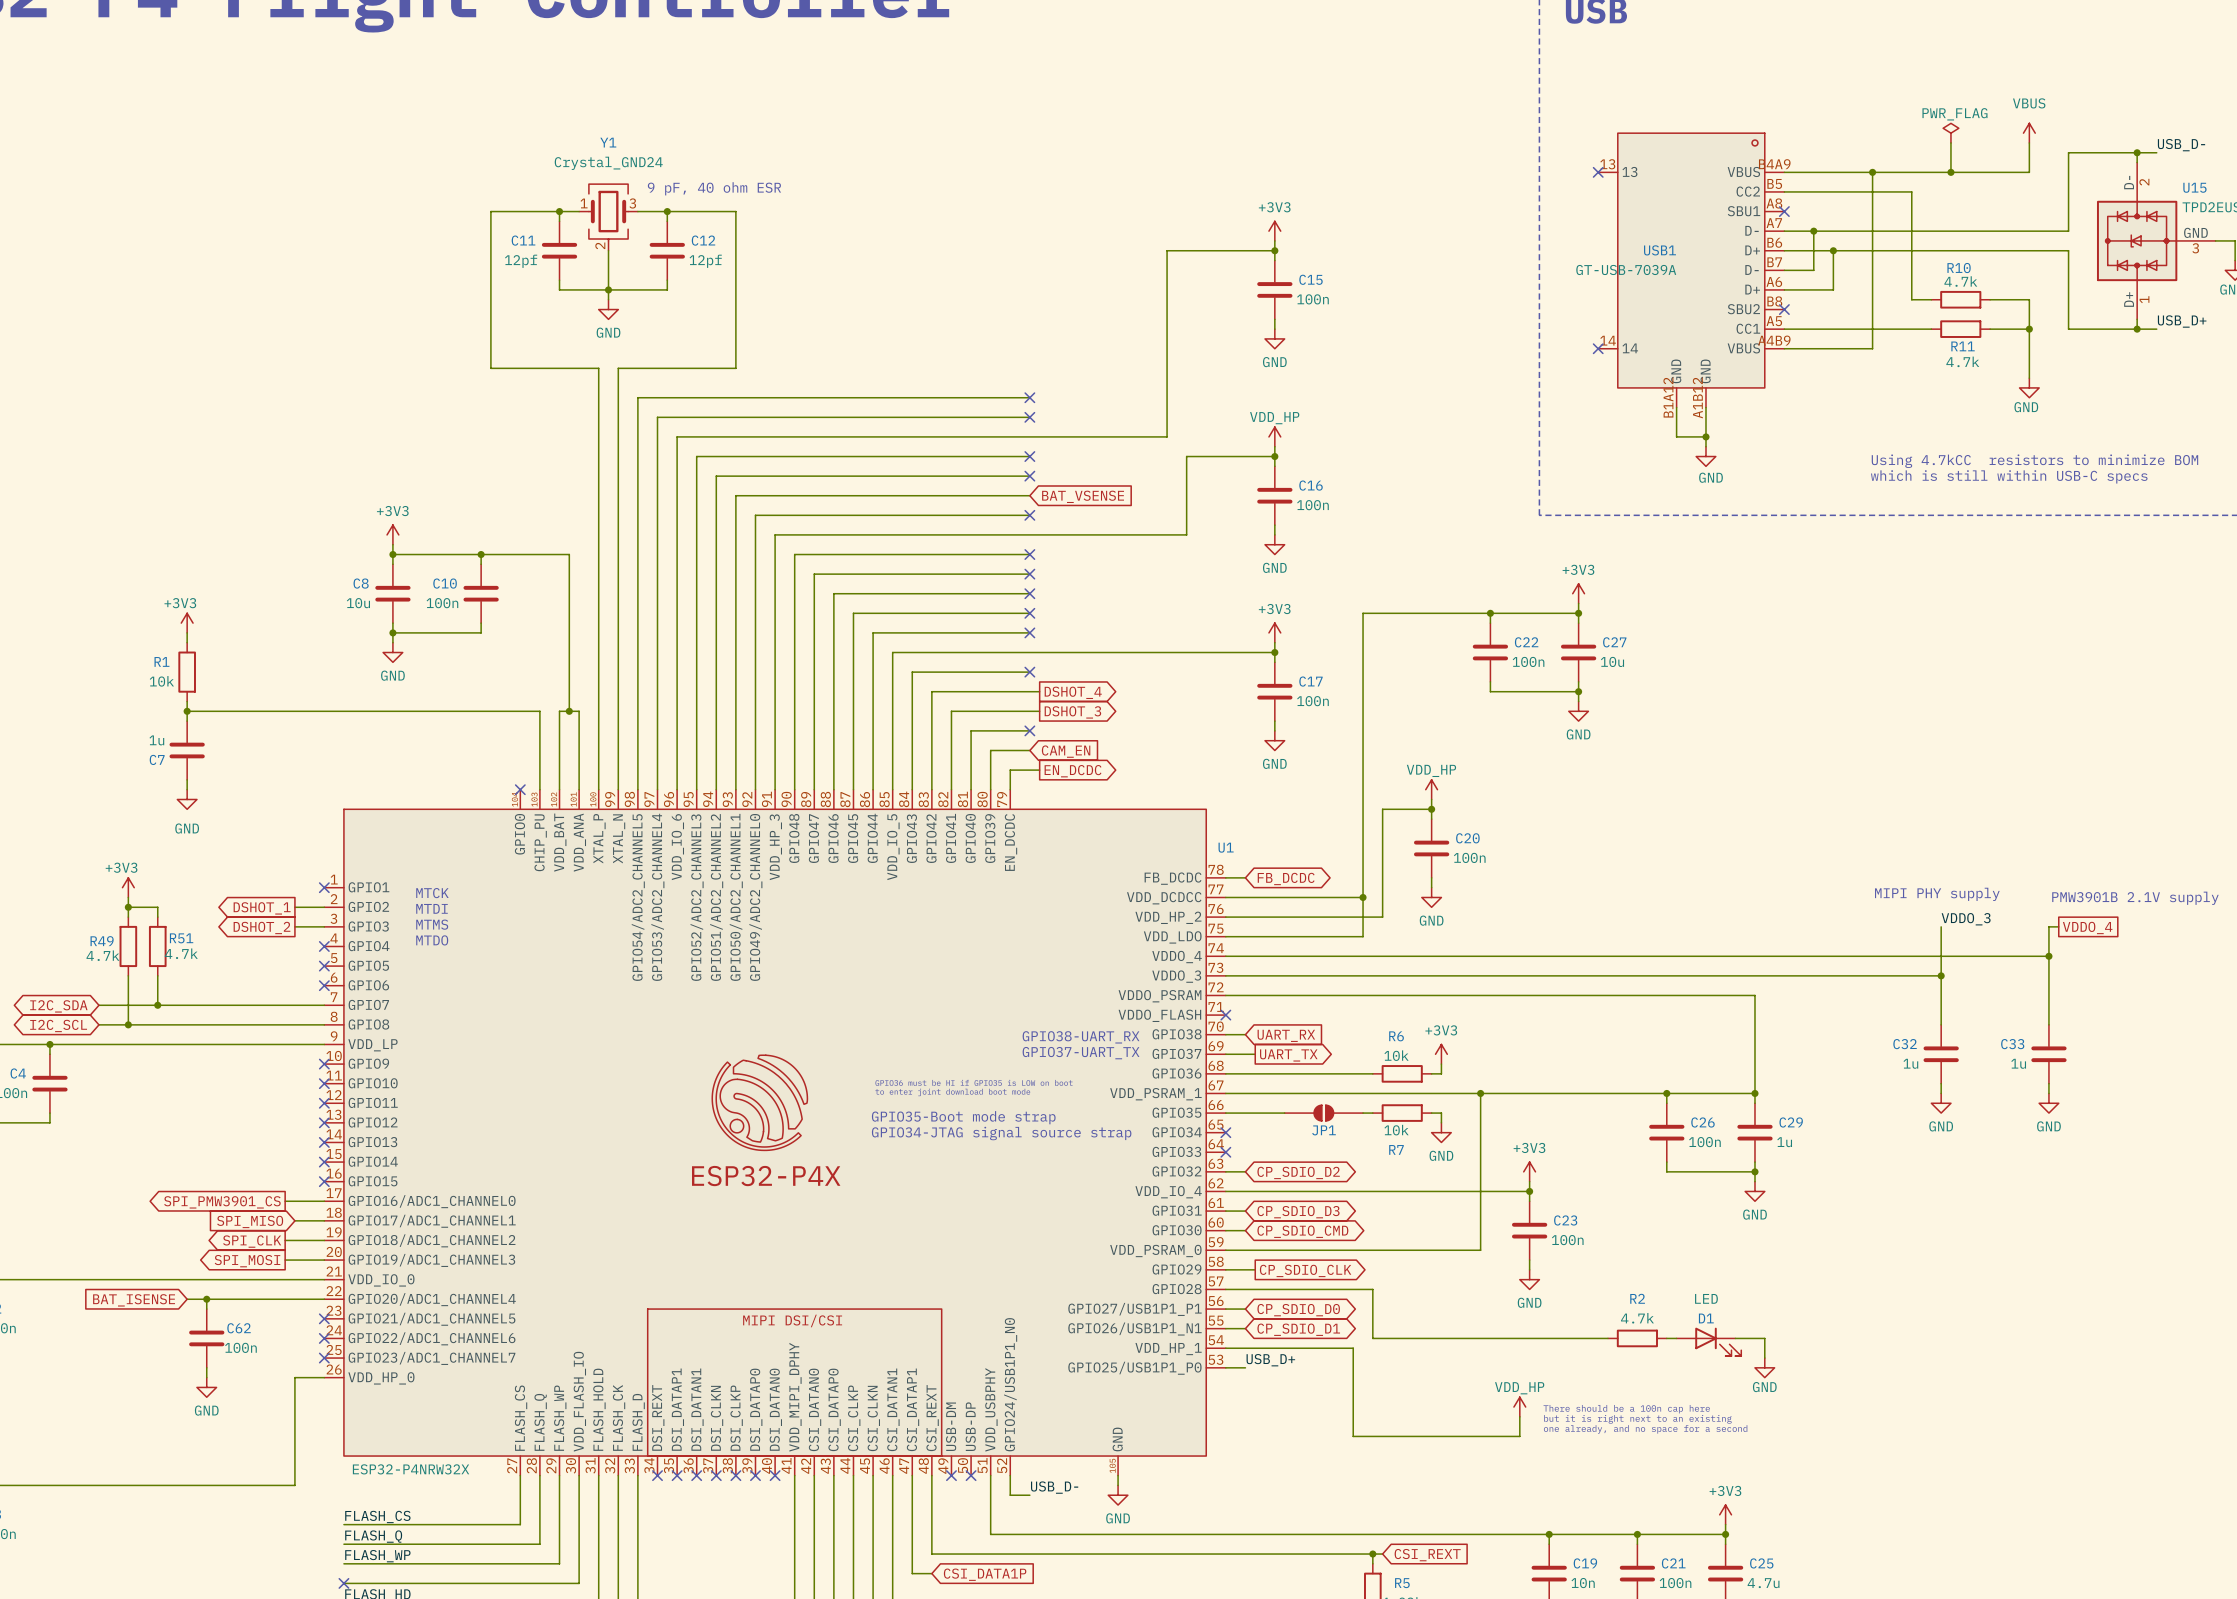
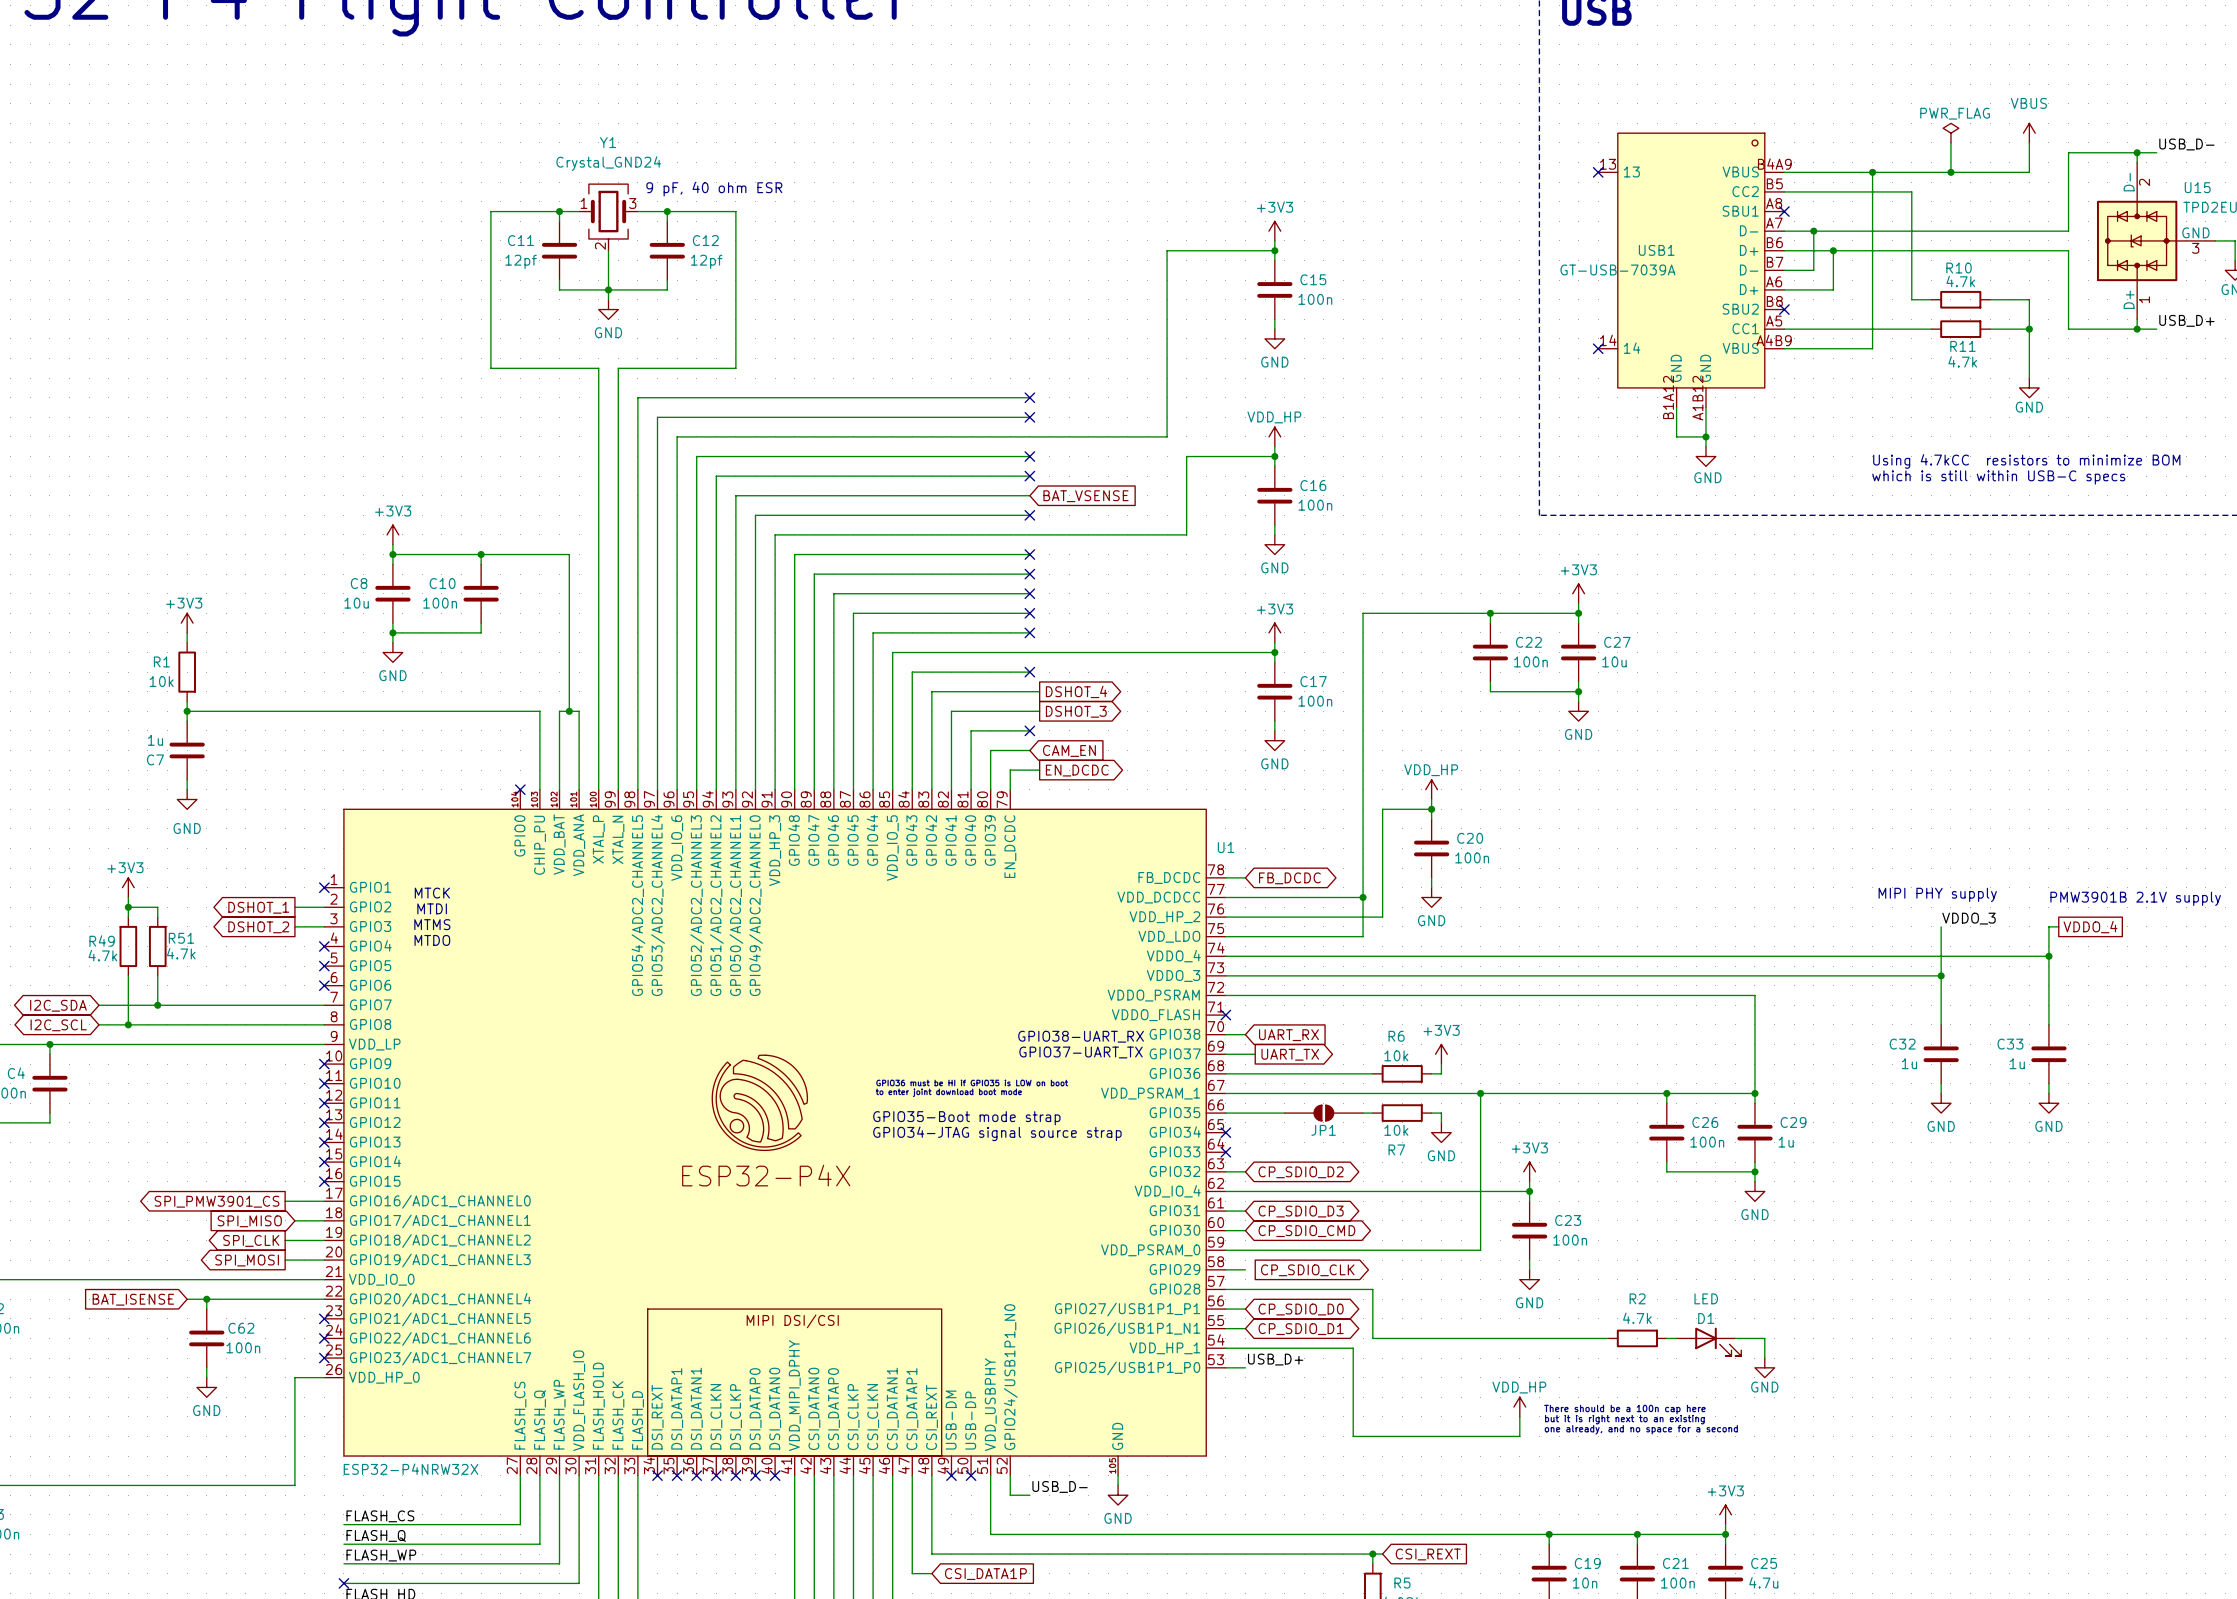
wire: (1245, 1269) (1255, 1269) -> none

